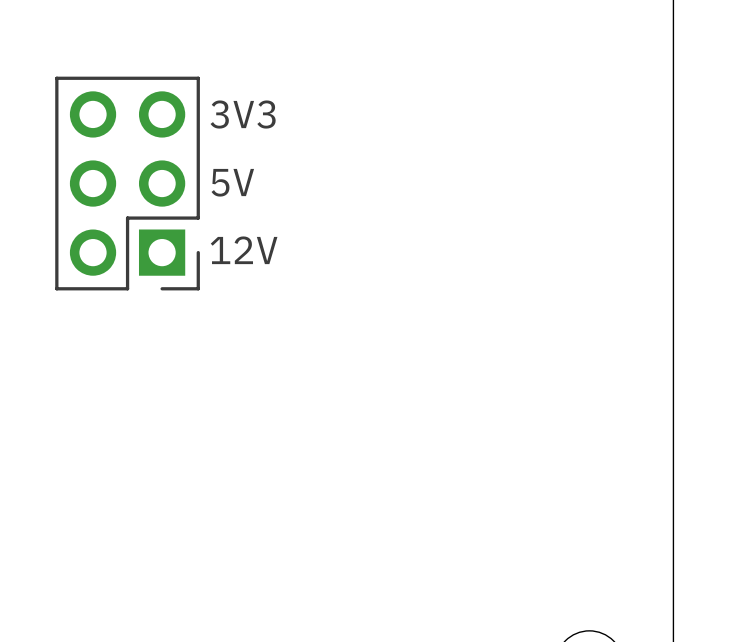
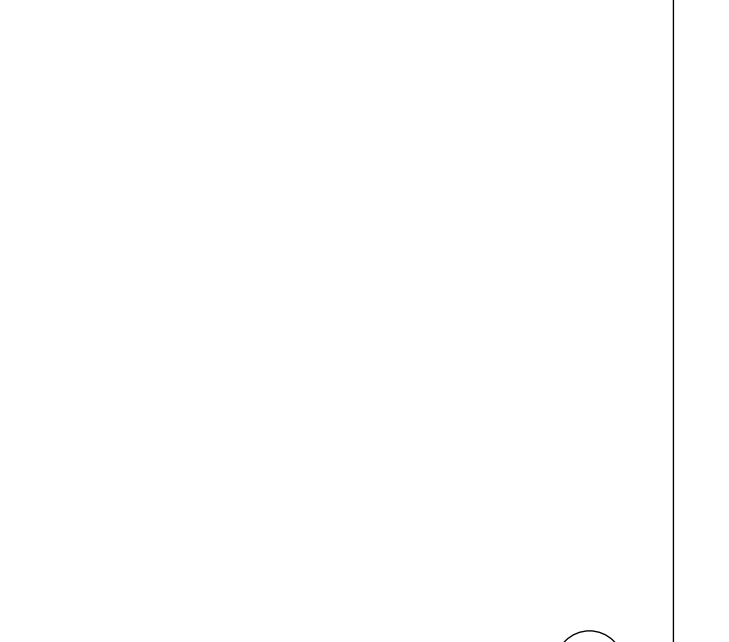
text: 3V3 (243, 114) -> none
text: 5V (232, 182) -> none
part: (127, 183) -> none
text: 12V (244, 250) -> none

